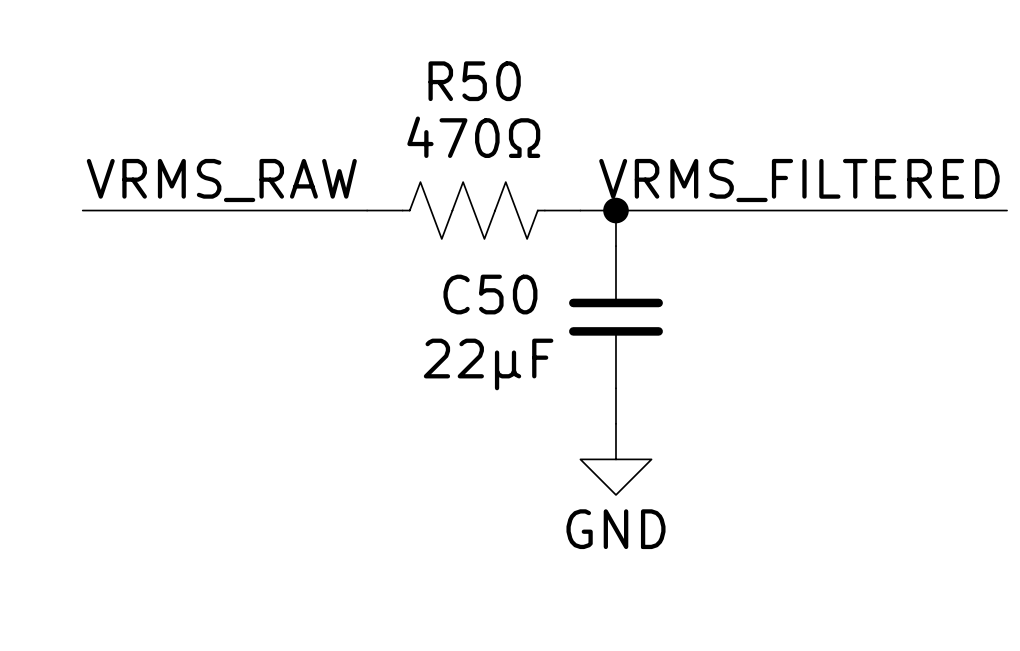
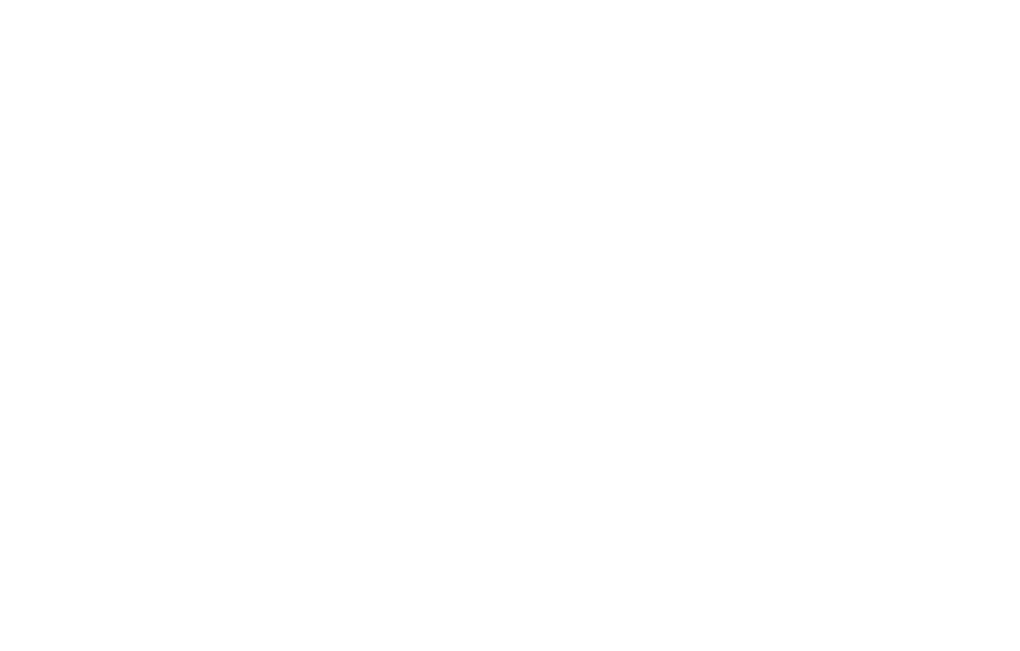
label: VRMS_RAW (221, 180) -> none
label: VRMS_FILTERED (799, 180) -> none
wire: (82, 210) (367, 210) -> none
R50: 470Ω (473, 210) -> none
wire: (580, 210) (1007, 210) -> none
wire: (615, 210) (615, 246) -> none
junction: (615, 210) -> none
C50: 22µF (615, 317) -> none
wire: (615, 388) (615, 423) -> none
power symbol: GND (615, 459) -> none

